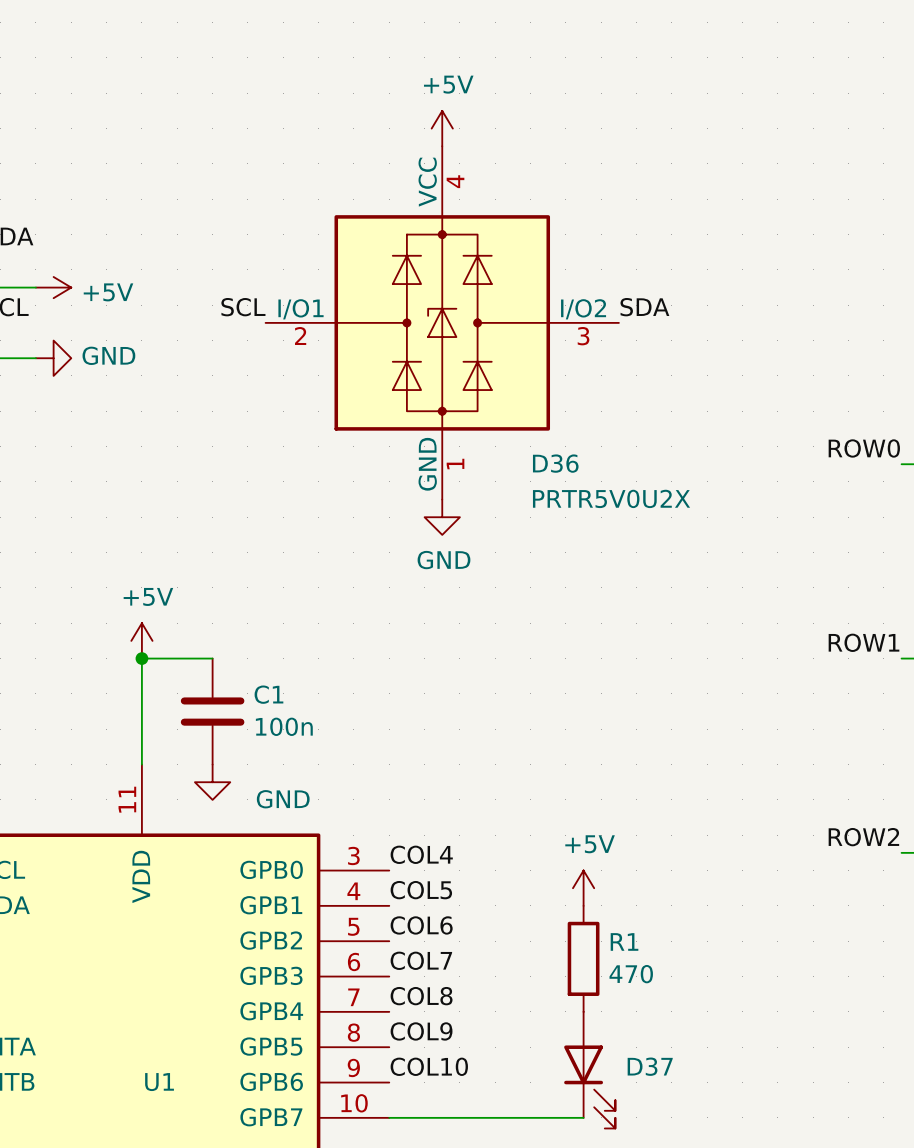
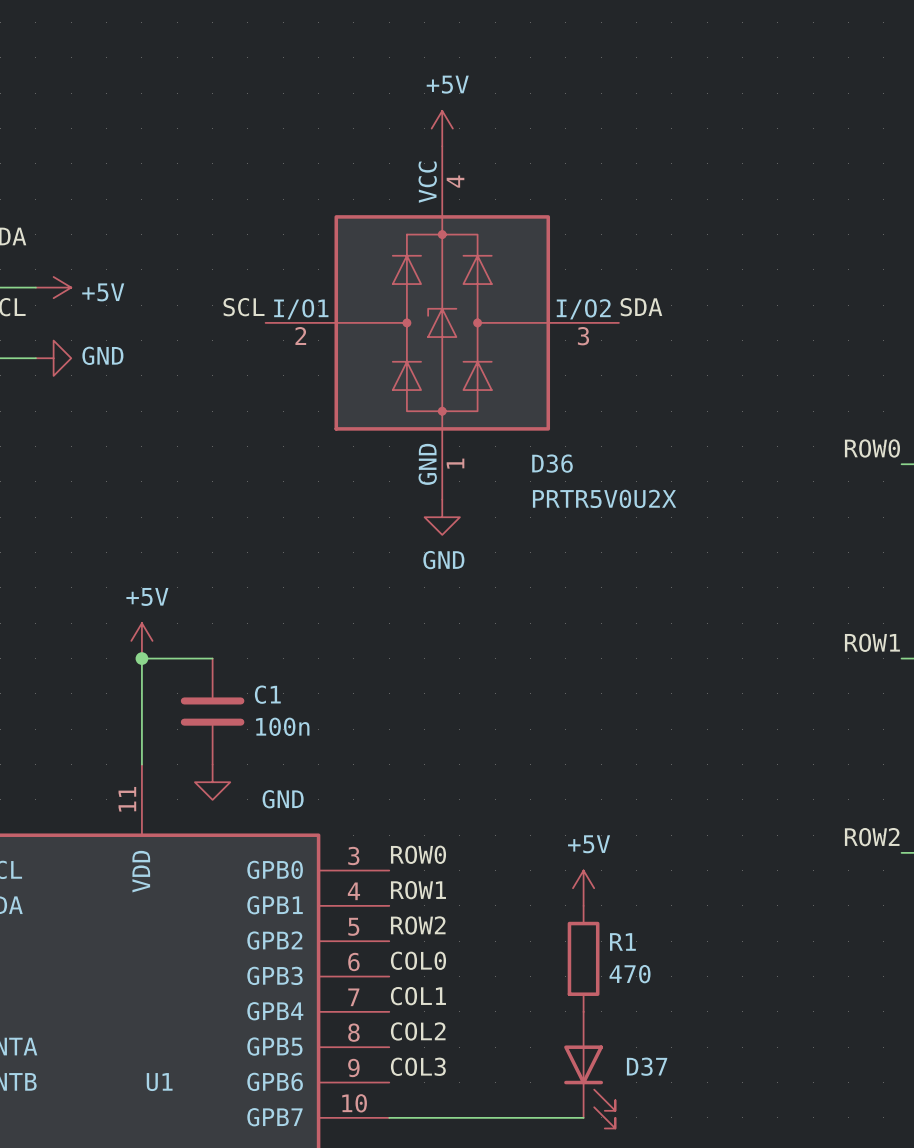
label: COL4 (421, 854) -> ROW0 (418, 854)
label: COL5 (421, 890) -> ROW1 (418, 890)
label: COL6 (421, 925) -> ROW2 (418, 925)
label: COL7 (421, 960) -> COL0 (418, 960)
label: COL8 (421, 996) -> COL1 (418, 996)
label: COL9 (421, 1031) -> COL2 (418, 1031)
label: COL10 (429, 1066) -> COL3 (418, 1066)

